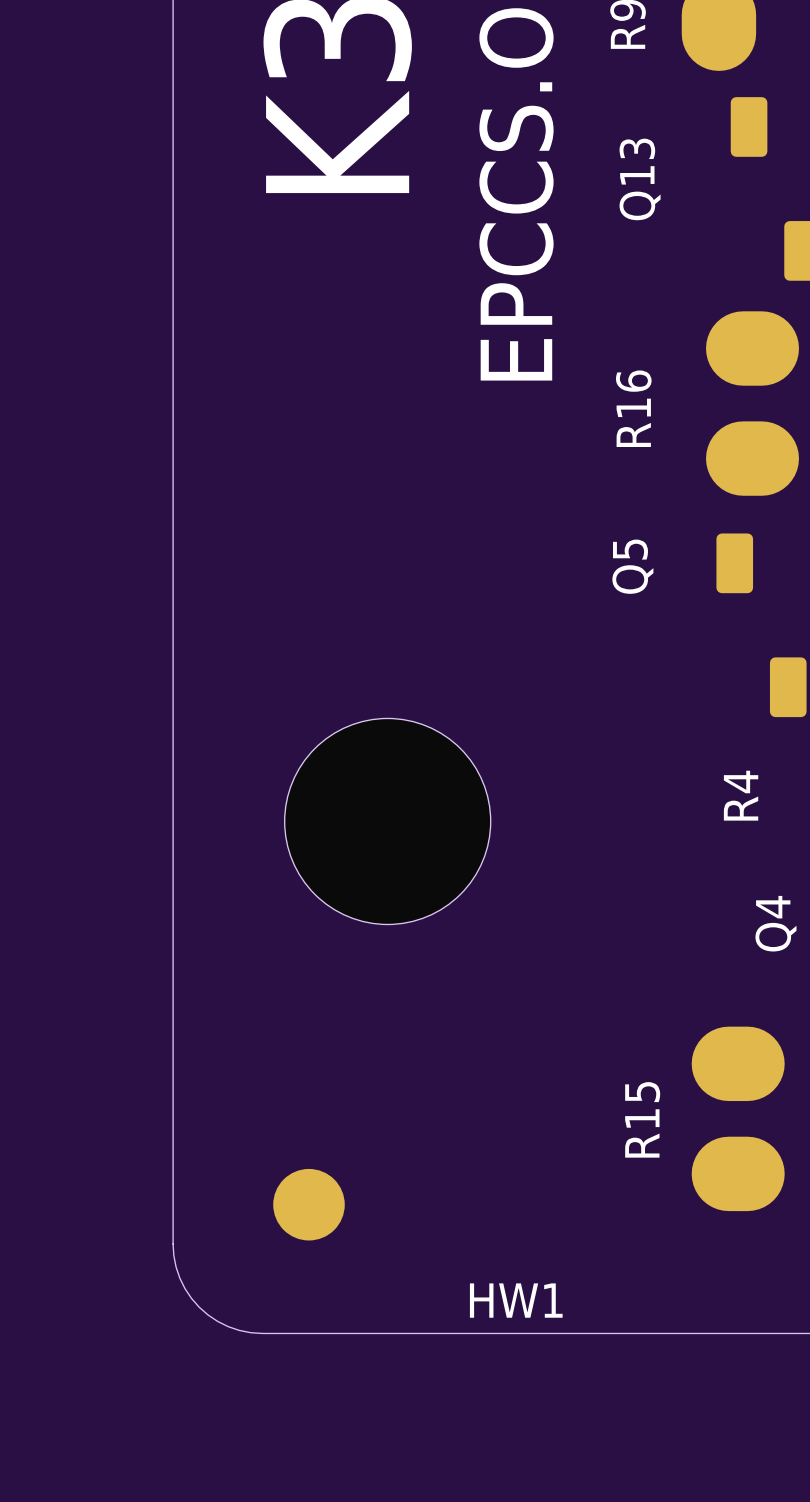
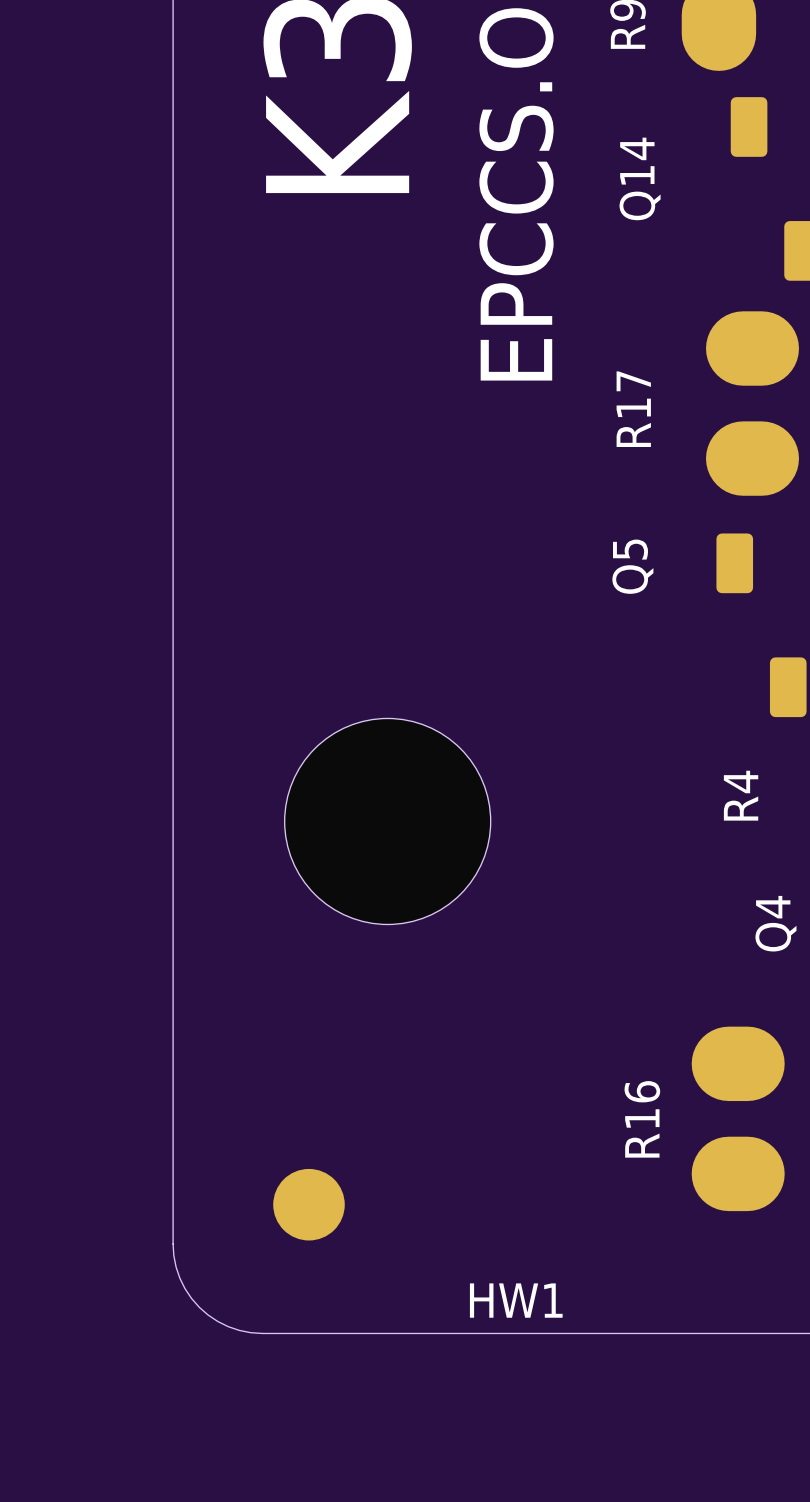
Q13 name: Q13 (640, 179) -> Q14 (640, 178)
R16 name: R16 (633, 408) -> R17 (633, 409)
R15 name: R15 (642, 1119) -> R16 (642, 1119)

